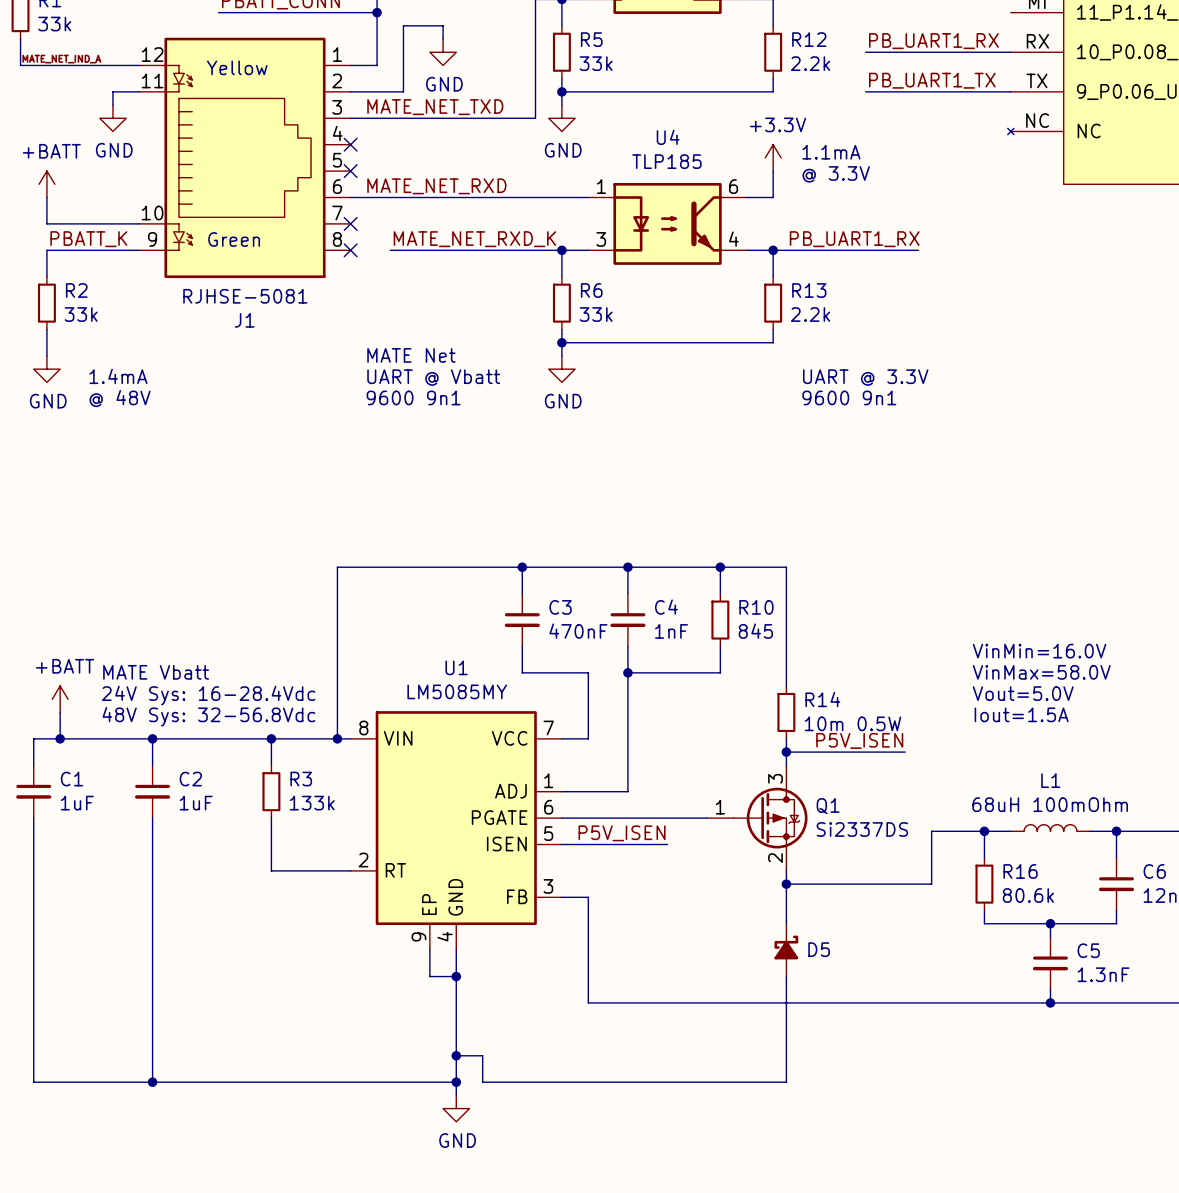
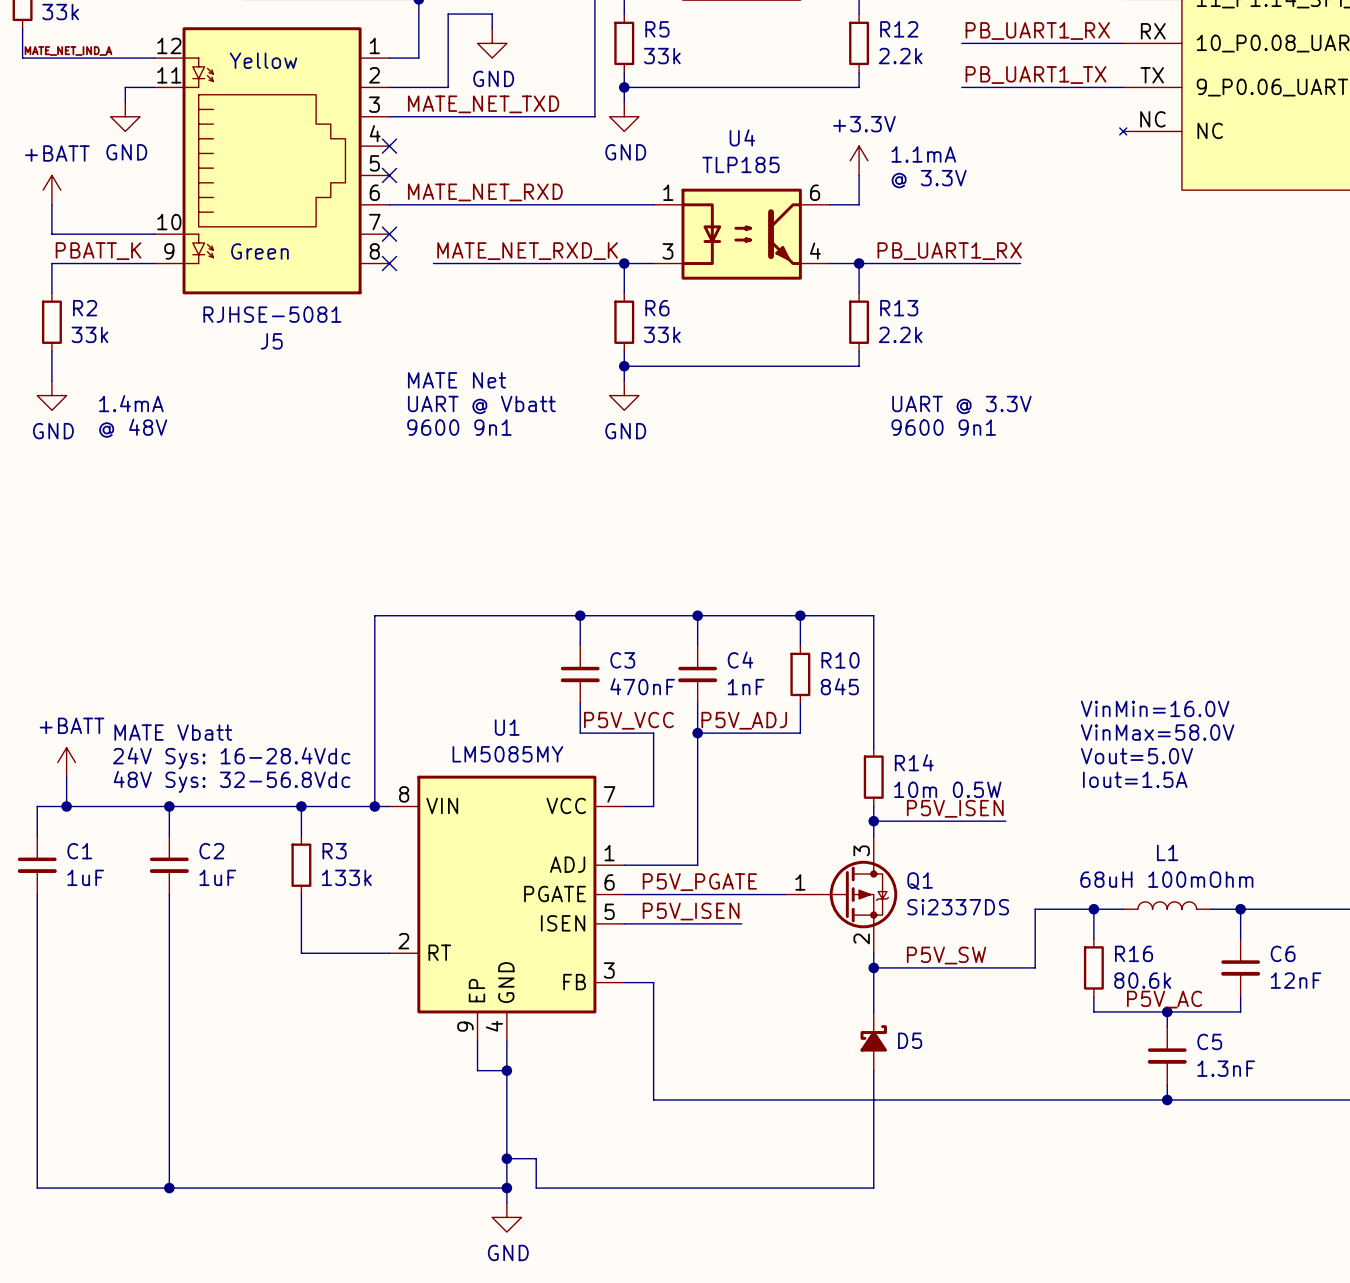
J1 name: J1 (244, 320) -> J5 (271, 341)
label: none -> P5V_VCC (628, 720)
label: none -> P5V_ADJ (744, 720)
label: none -> P5V_PGATE (699, 882)
label: none -> P5V_SW (946, 955)
label: none -> P5V_AC (1164, 999)

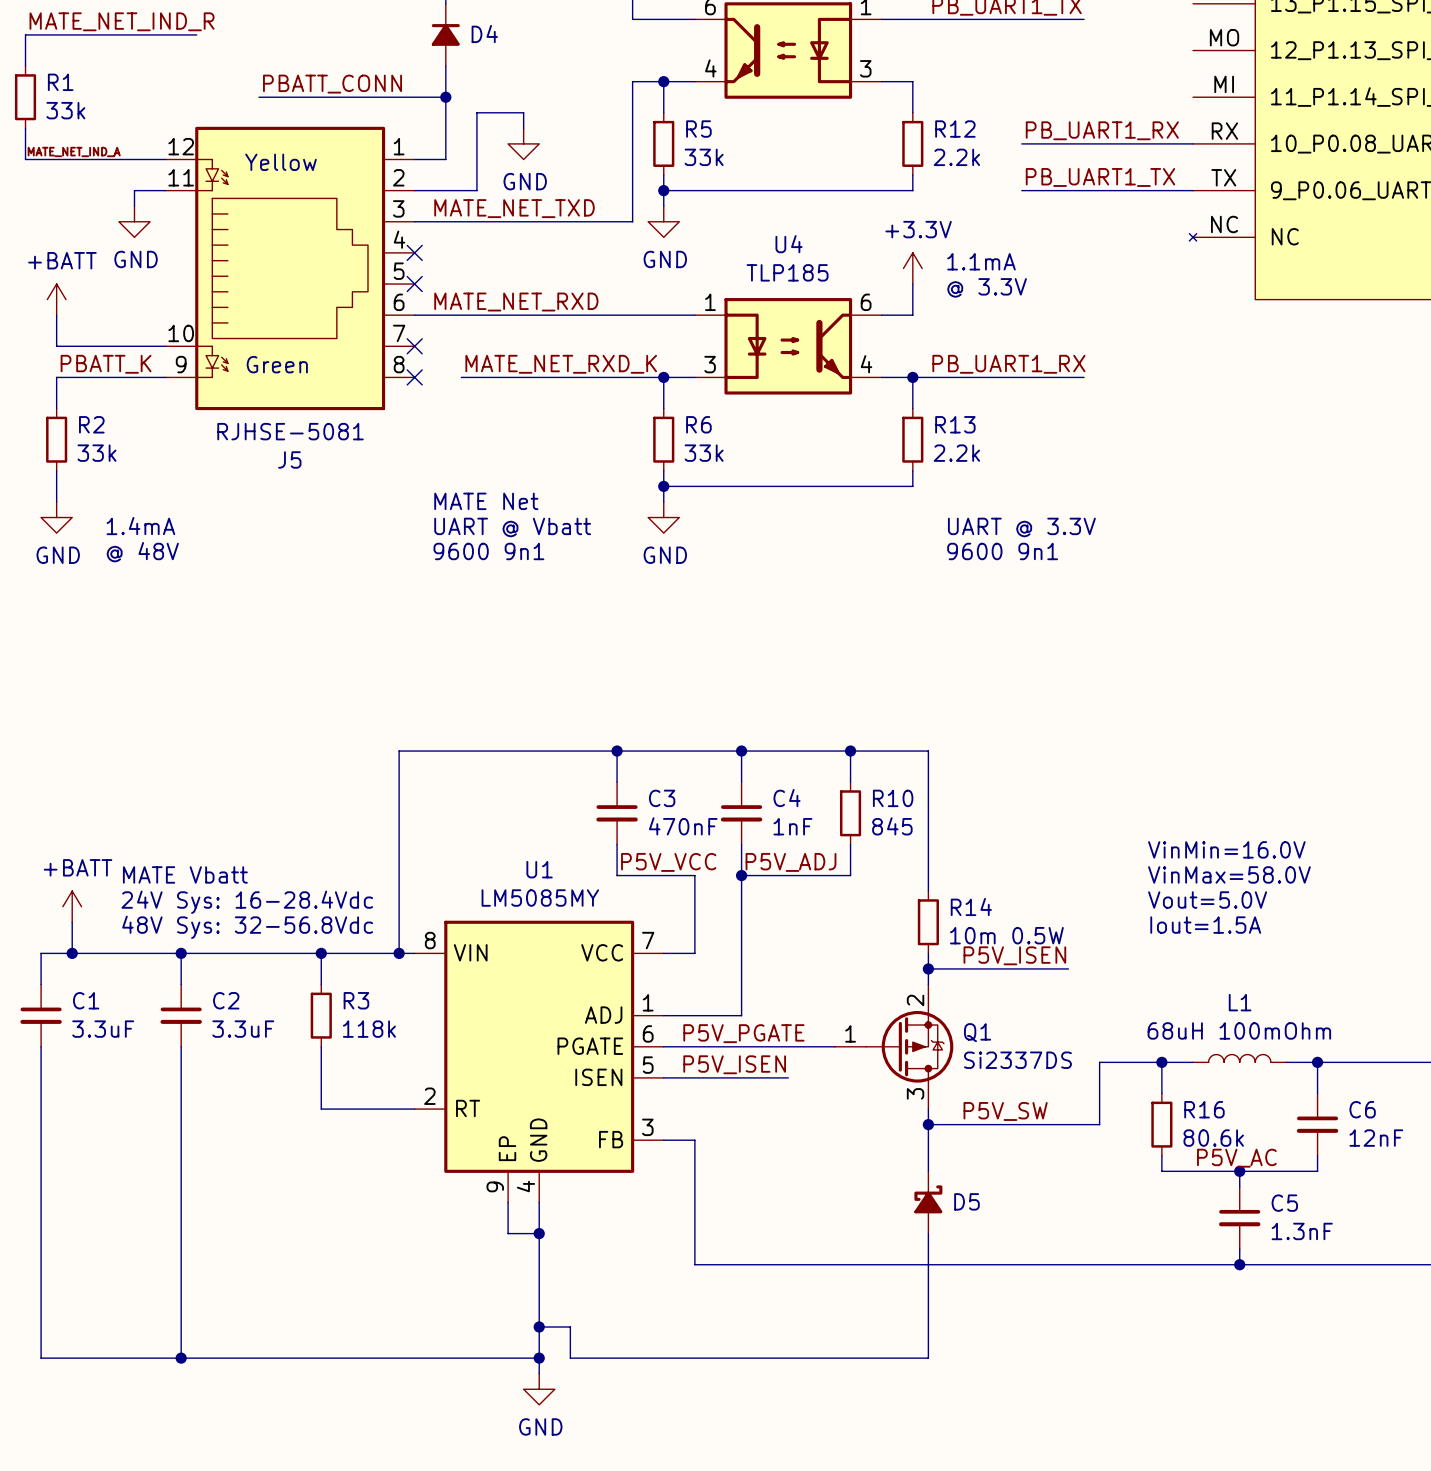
C1 value: 1uF (85, 877) -> 3.3uF (103, 1029)
C2 value: 1uF (217, 877) -> 3.3uF (243, 1029)
R3 value: 133k (346, 877) -> 118k (369, 1029)
Q1 flip: as is (856, 894) -> up-down (909, 1046)

